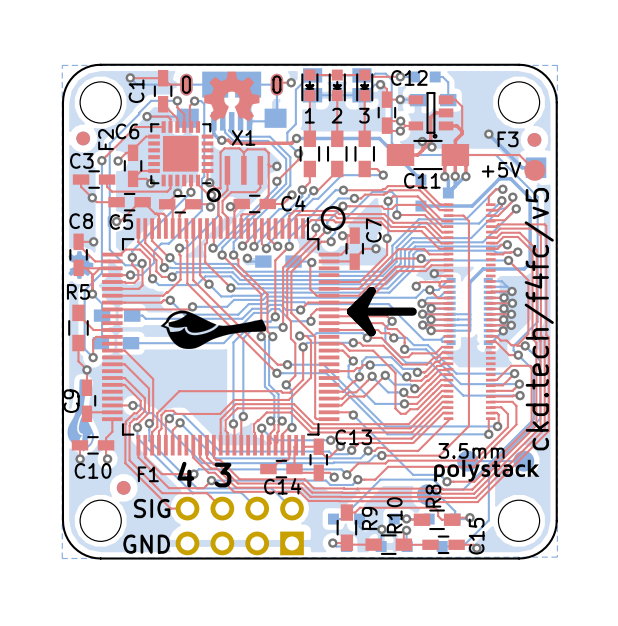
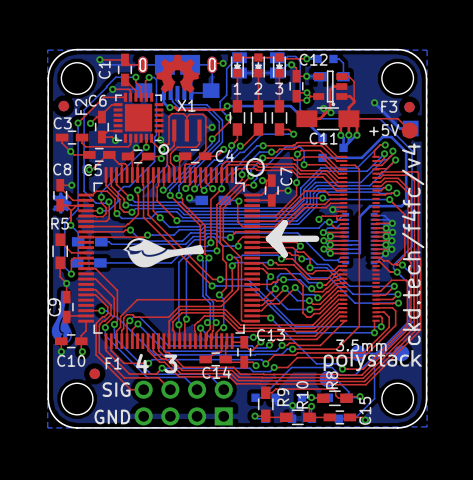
text: ckd.tech/f4fc/v5 (539, 319) -> ckd.tech/f4fc/v4 (413, 244)
drawing shape: [434, 459, 540, 482] -> [323, 350, 423, 372]

